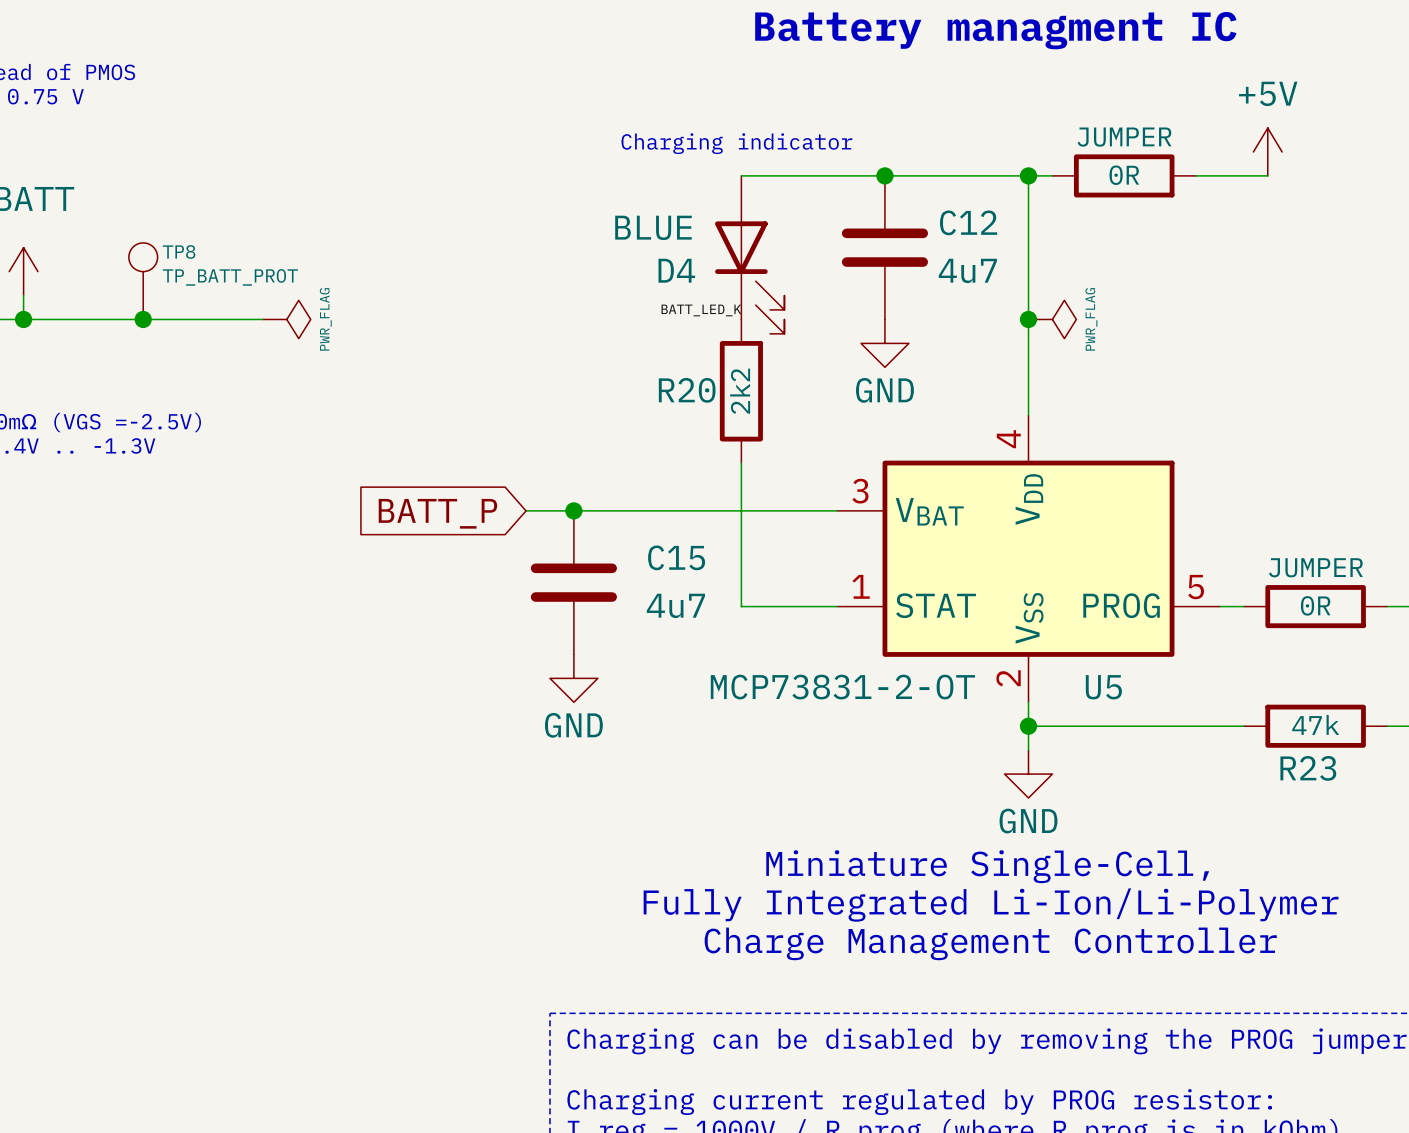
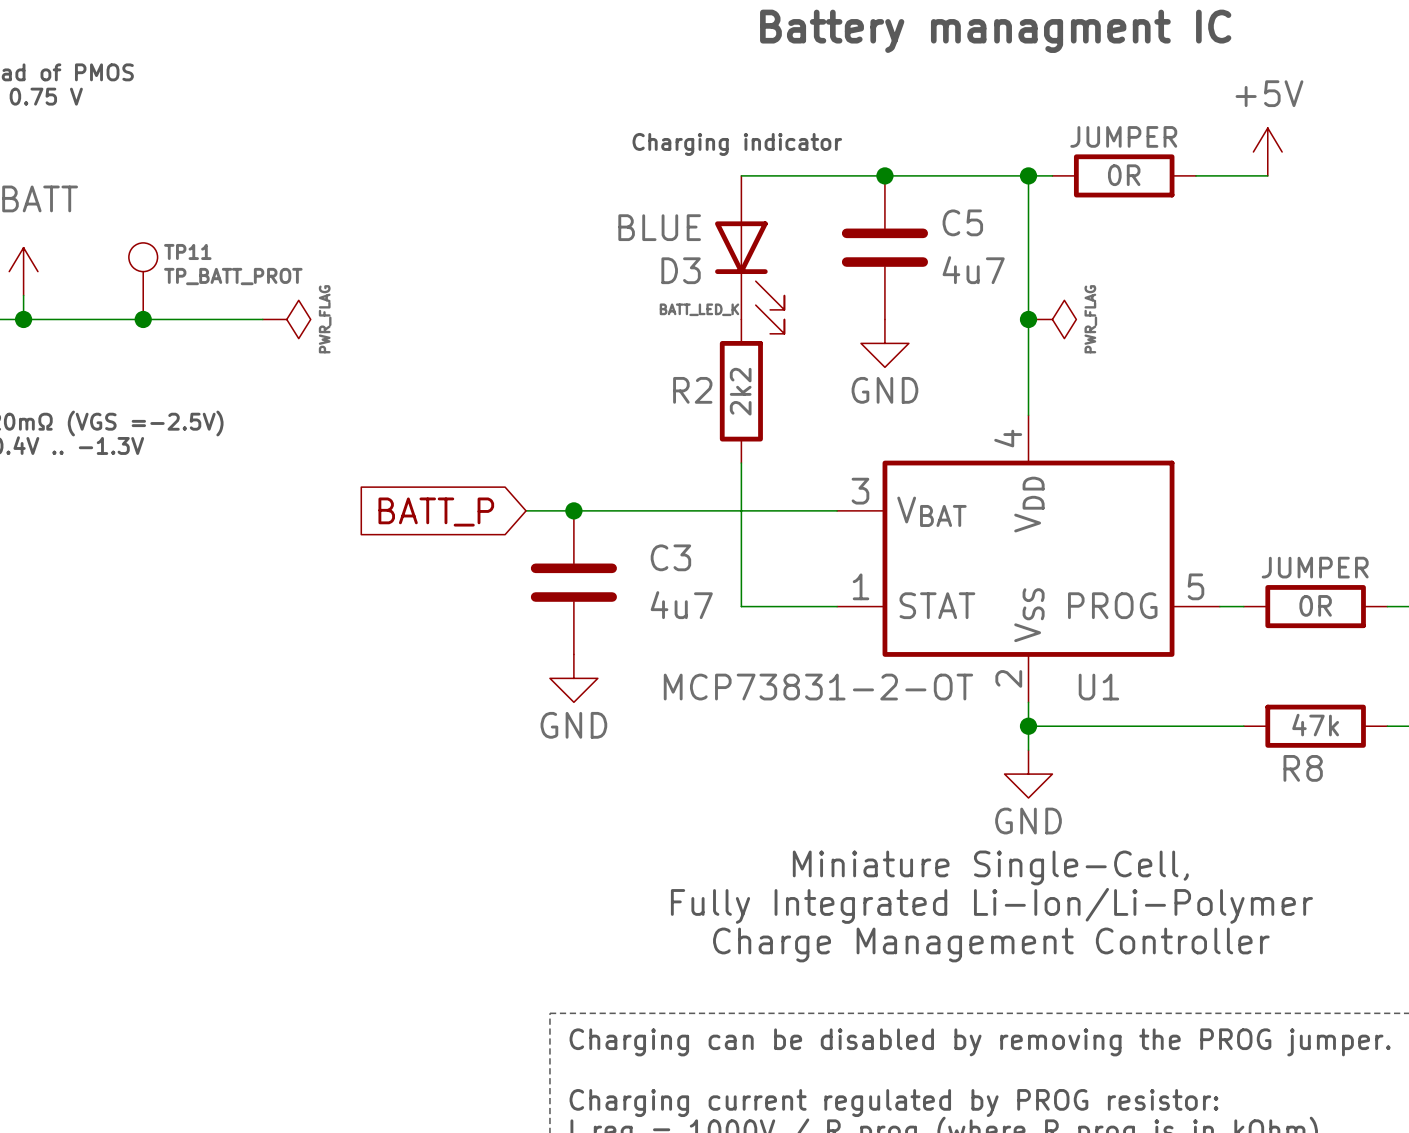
C12 name: C12 (968, 222) -> C5 (962, 222)
TP8 name: TP8 (179, 251) -> TP11 (187, 251)
D4 name: D4 (676, 270) -> D3 (681, 270)
R20 name: R20 (687, 390) -> R2 (692, 390)
C15 name: C15 (676, 557) -> C3 (670, 557)
U5 name: U5 (1103, 687) -> U1 (1098, 687)
R23 name: R23 (1308, 768) -> R8 (1303, 768)

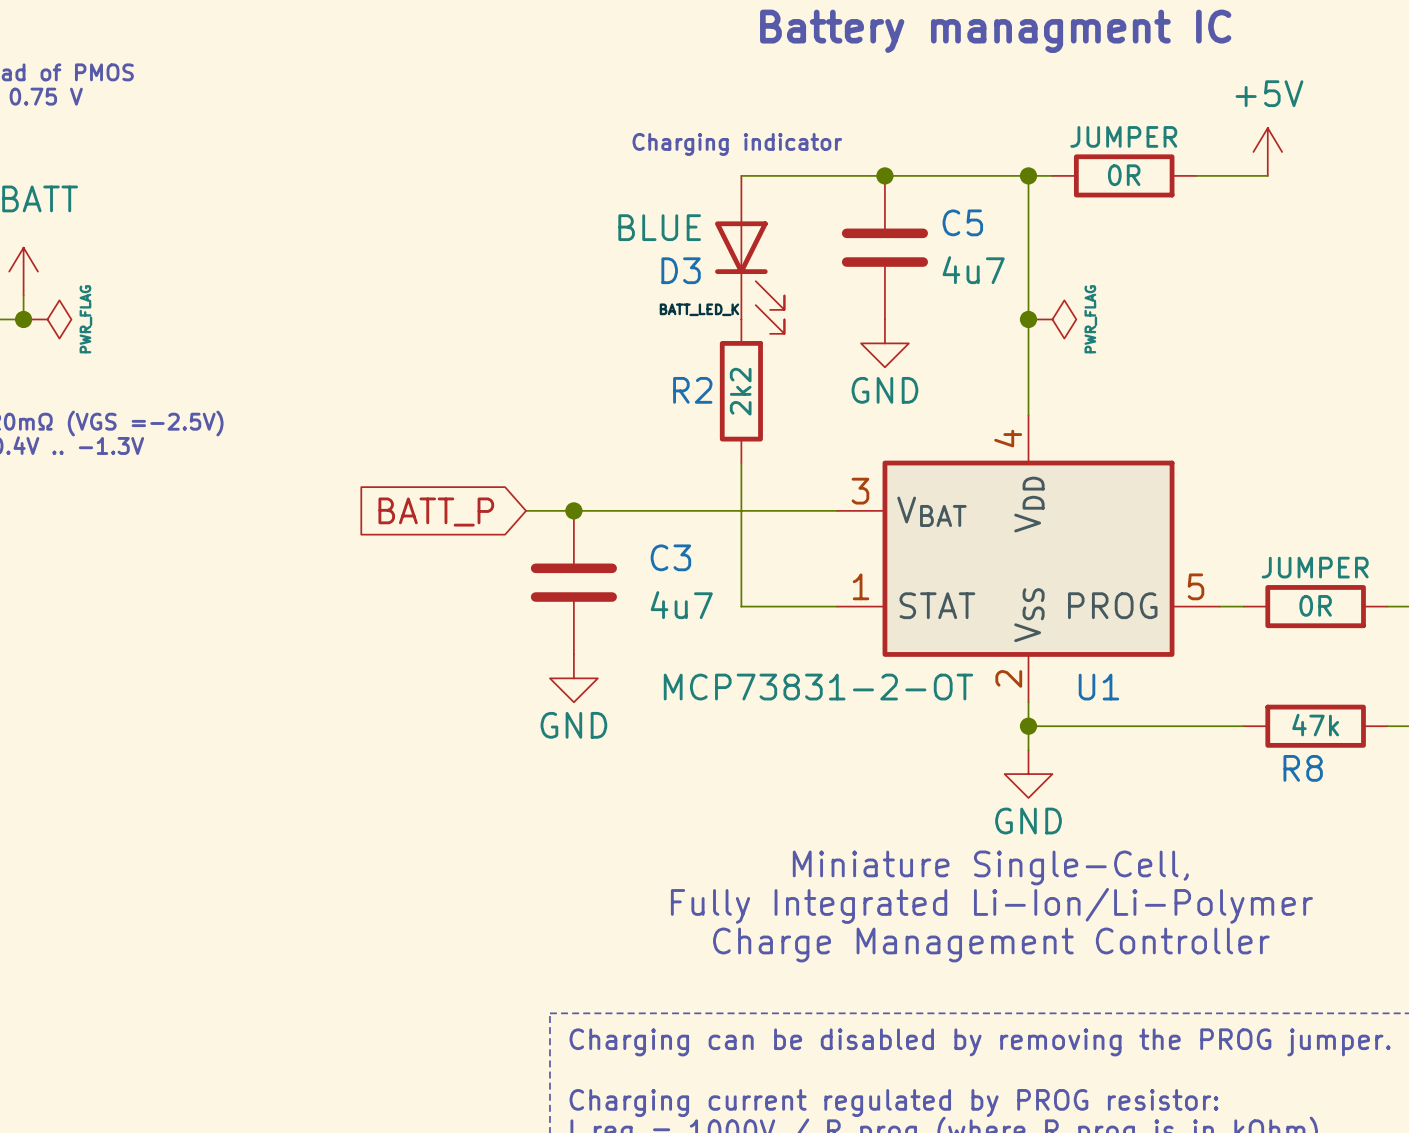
TP11: TP_BATT_PROT (143, 281) -> none
wire: (23, 319) (262, 319) -> none
junction: (143, 319) -> none
power symbol position: PWR_FLAG (286, 319) -> PWR_FLAG (47, 319)

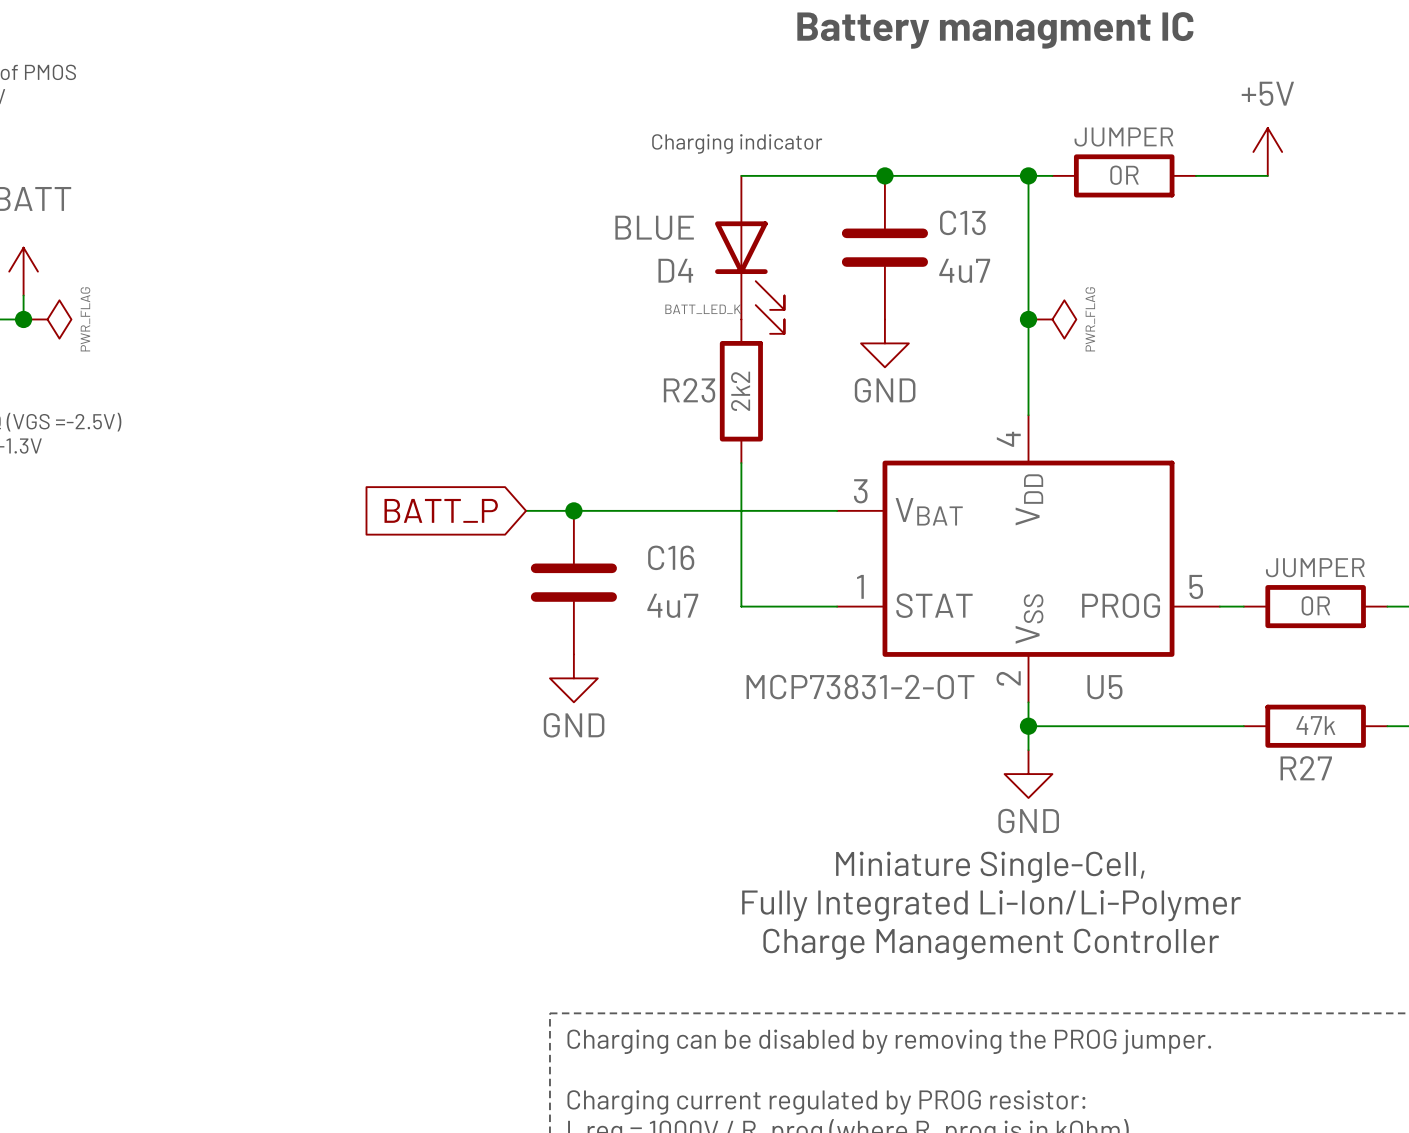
C5 name: C5 (962, 222) -> C13 (962, 222)
D3 name: D3 (681, 270) -> D4 (675, 270)
R2 name: R2 (692, 390) -> R23 (689, 390)
C3 name: C3 (670, 557) -> C16 (671, 557)
U1 name: U1 (1098, 687) -> U5 (1104, 687)
R8 name: R8 (1303, 768) -> R27 (1306, 768)

